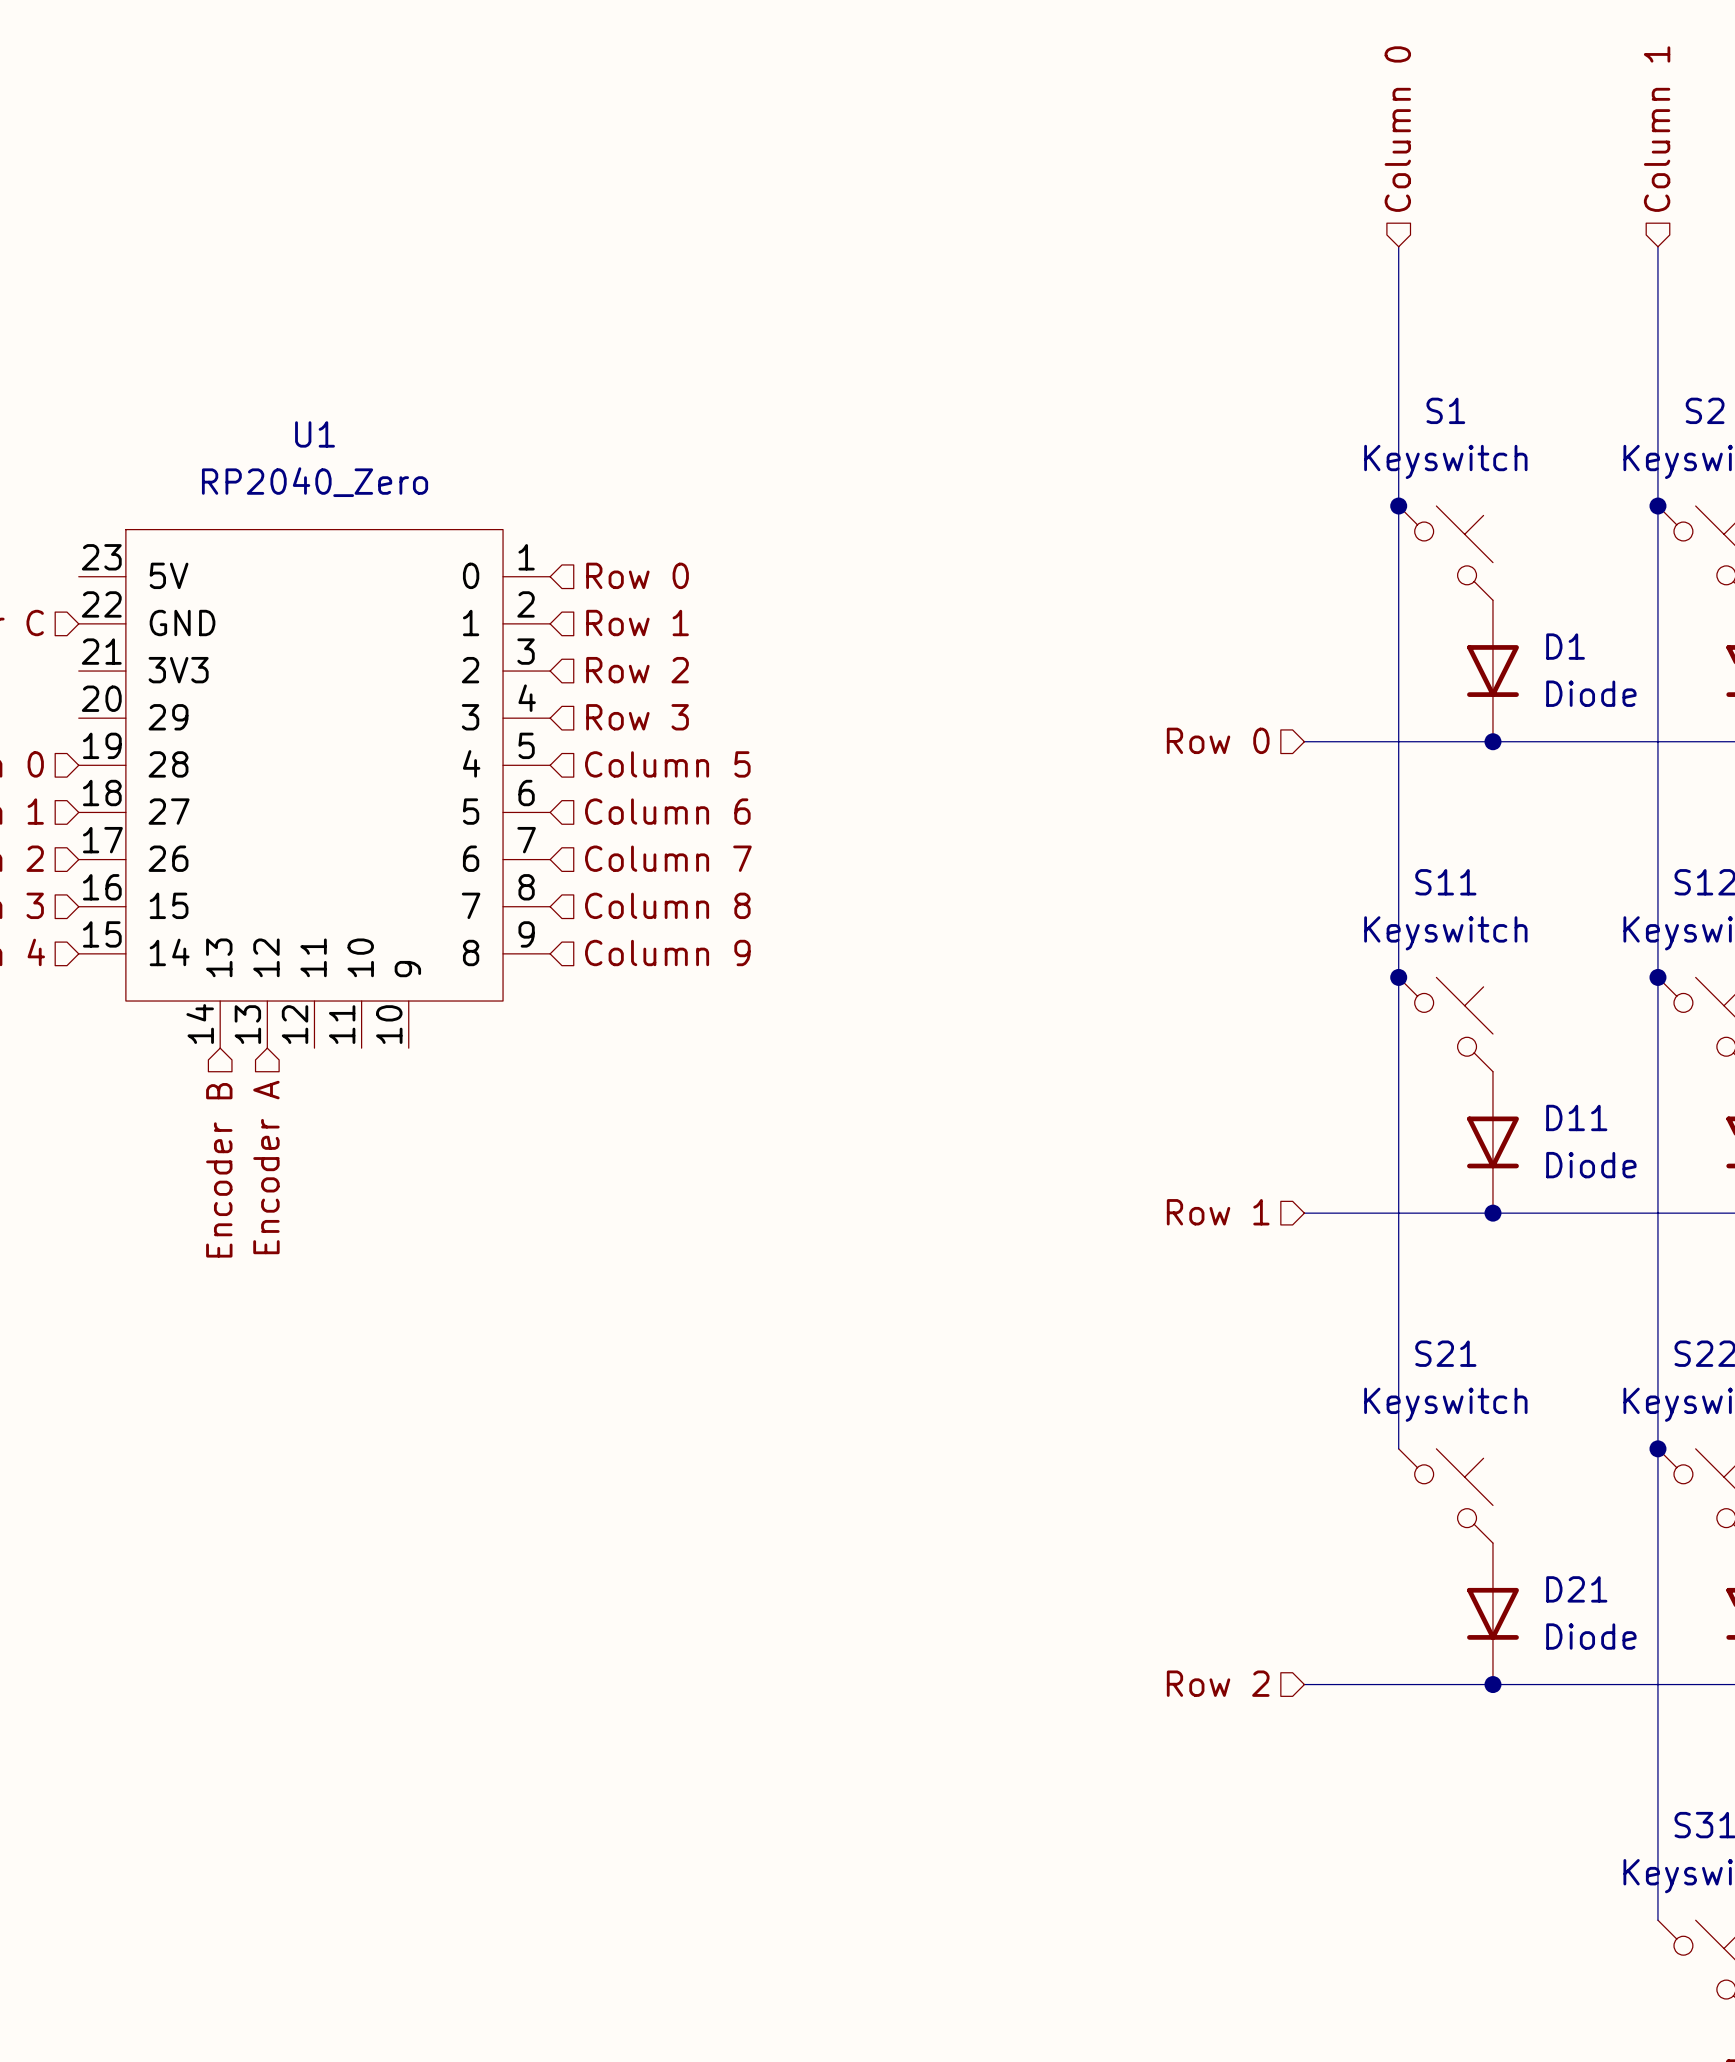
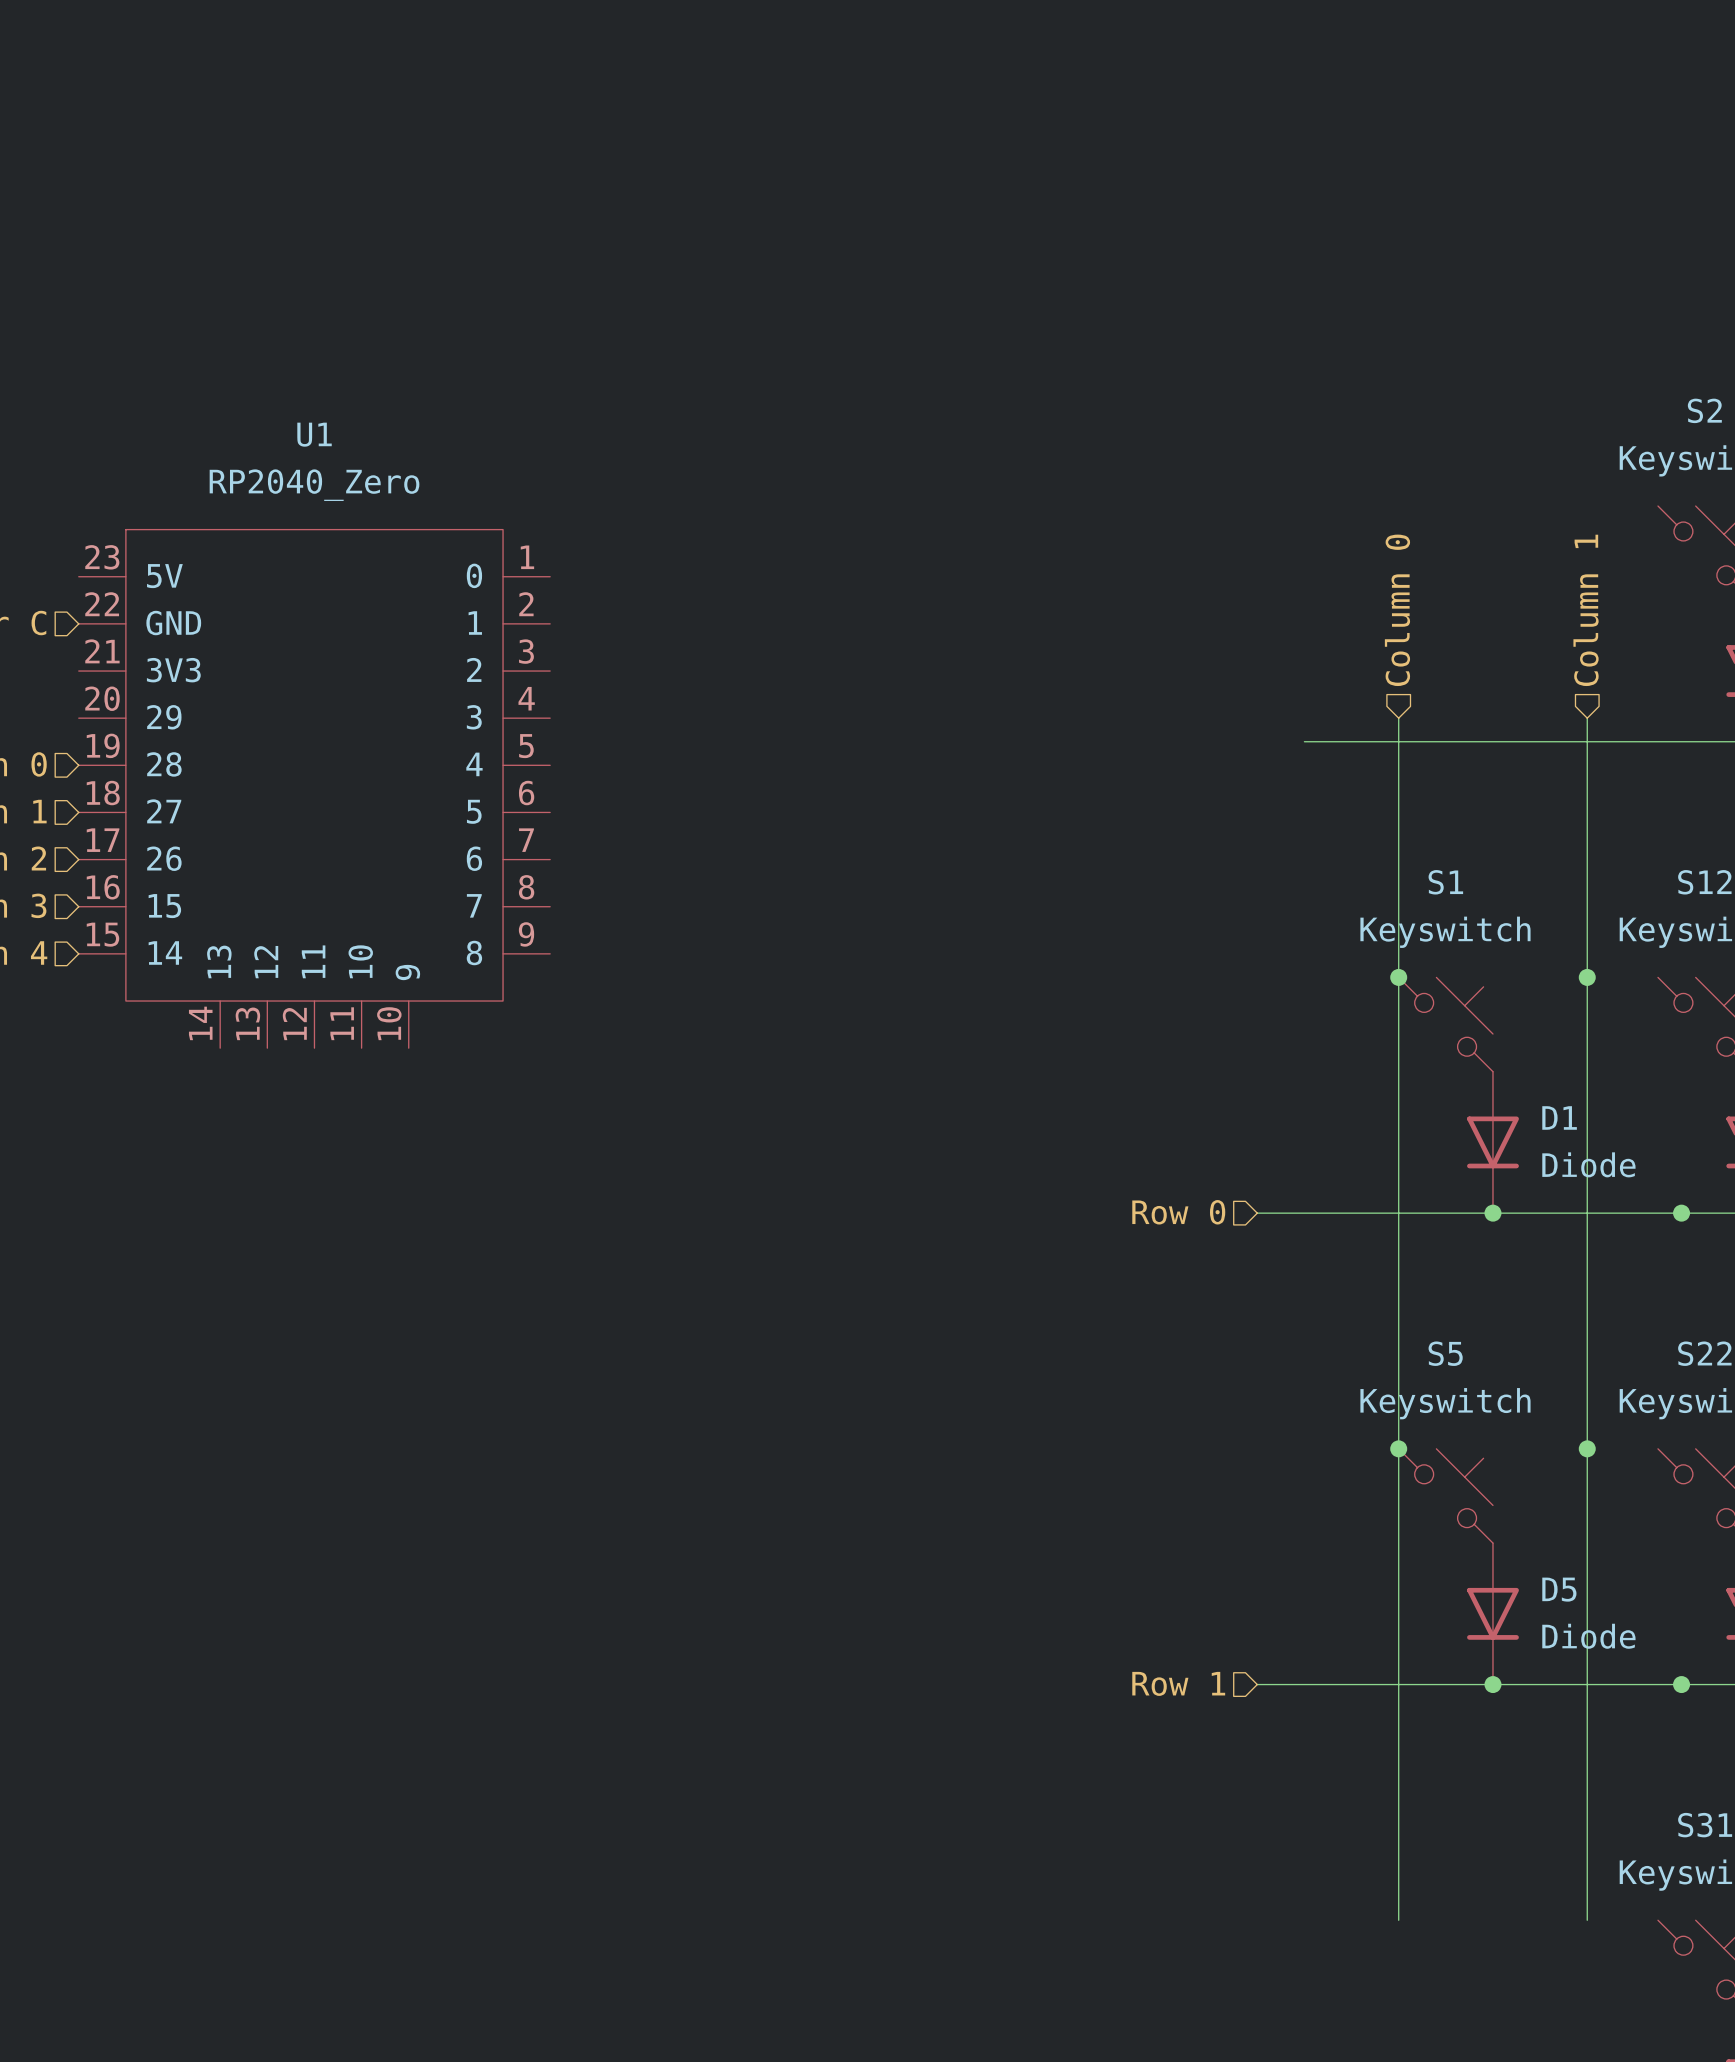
hierarchical label: Column 0 (1397, 129) -> none
hierarchical label: Column 1 (1657, 129) -> none
wire: (1398, 246) (1398, 718) -> none
wire: (1657, 246) (1657, 1920) -> none
junction: (1398, 506) -> none
junction: (1657, 506) -> none
S1: Keyswitch (1445, 553) -> none
hierarchical label: Row 0 (637, 575) -> none
hierarchical label: none -> Column 0 (1397, 610)
hierarchical label: none -> Column 1 (1586, 610)
hierarchical label: Row 1 (637, 623) -> none
hierarchical label: Row 2 (637, 670) -> none
D1: Diode (1492, 671) -> none
hierarchical label: Row 3 (637, 717) -> none
wire: none -> (1587, 718) (1587, 1920)
hierarchical label: Row 0 (1218, 740) -> none
junction: (1492, 741) -> none
hierarchical label: Column 5 (667, 764) -> none
hierarchical label: Column 6 (667, 811) -> none
hierarchical label: Column 7 (668, 858) -> none
S11 name: S11 (1445, 882) -> S1 (1445, 882)
hierarchical label: Column 8 (667, 905) -> none
hierarchical label: Column 9 (667, 952) -> none
junction: none -> (1587, 977)
junction: (1657, 977) -> none
D11 name: D11 (1576, 1117) -> D1 (1559, 1117)
hierarchical label: Encoder A (266, 1167) -> none
hierarchical label: Encoder B (219, 1170) -> none
hierarchical label: Row 1 (1218, 1212) -> Row 0 (1178, 1212)
wire: none -> (1257, 1213) (1304, 1213)
junction: none -> (1681, 1213)
S21 name: S21 (1445, 1353) -> S5 (1445, 1353)
wire: none -> (1398, 1448) (1398, 1920)
junction: none -> (1398, 1448)
junction: none -> (1587, 1448)
junction: (1657, 1448) -> none
D21 name: D21 (1576, 1589) -> D5 (1559, 1589)
hierarchical label: Row 2 (1218, 1683) -> Row 1 (1178, 1683)
wire: none -> (1257, 1684) (1304, 1684)
junction: none -> (1681, 1684)

